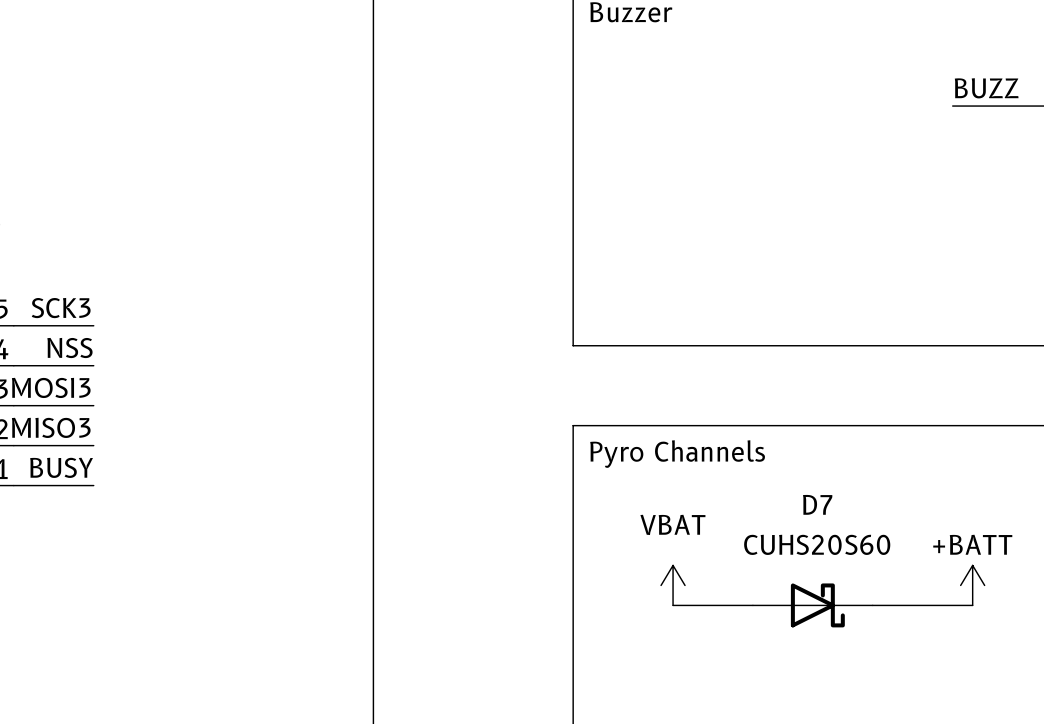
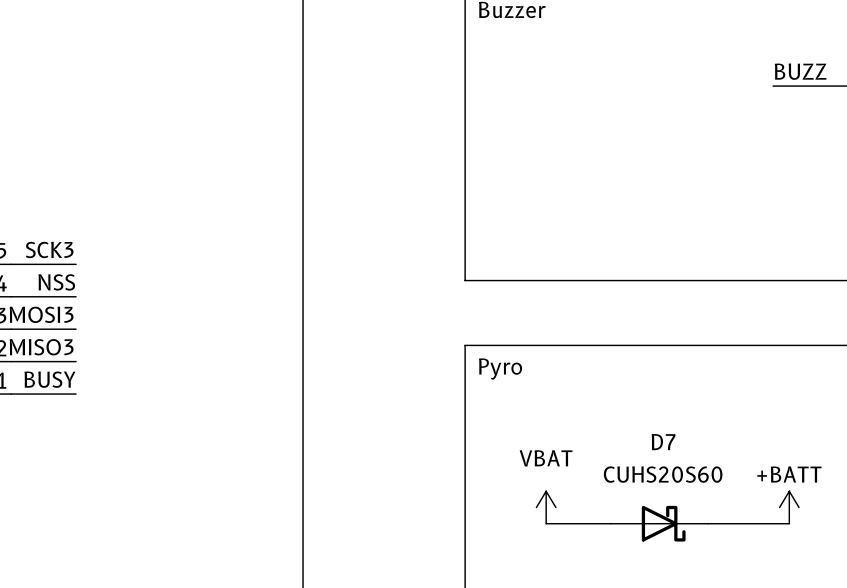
text: Pyro Channels (677, 454) -> Pyro (500, 369)
power symbol position: VBAT (673, 585) -> VBAT (546, 507)
power symbol position: +BATT (972, 585) -> +BATT (789, 507)
wire: (673, 605) (752, 605) -> (546, 523) (611, 523)
D7 position: (812, 605) -> (659, 523)
wire: (872, 605) (972, 605) -> (708, 523) (789, 523)

